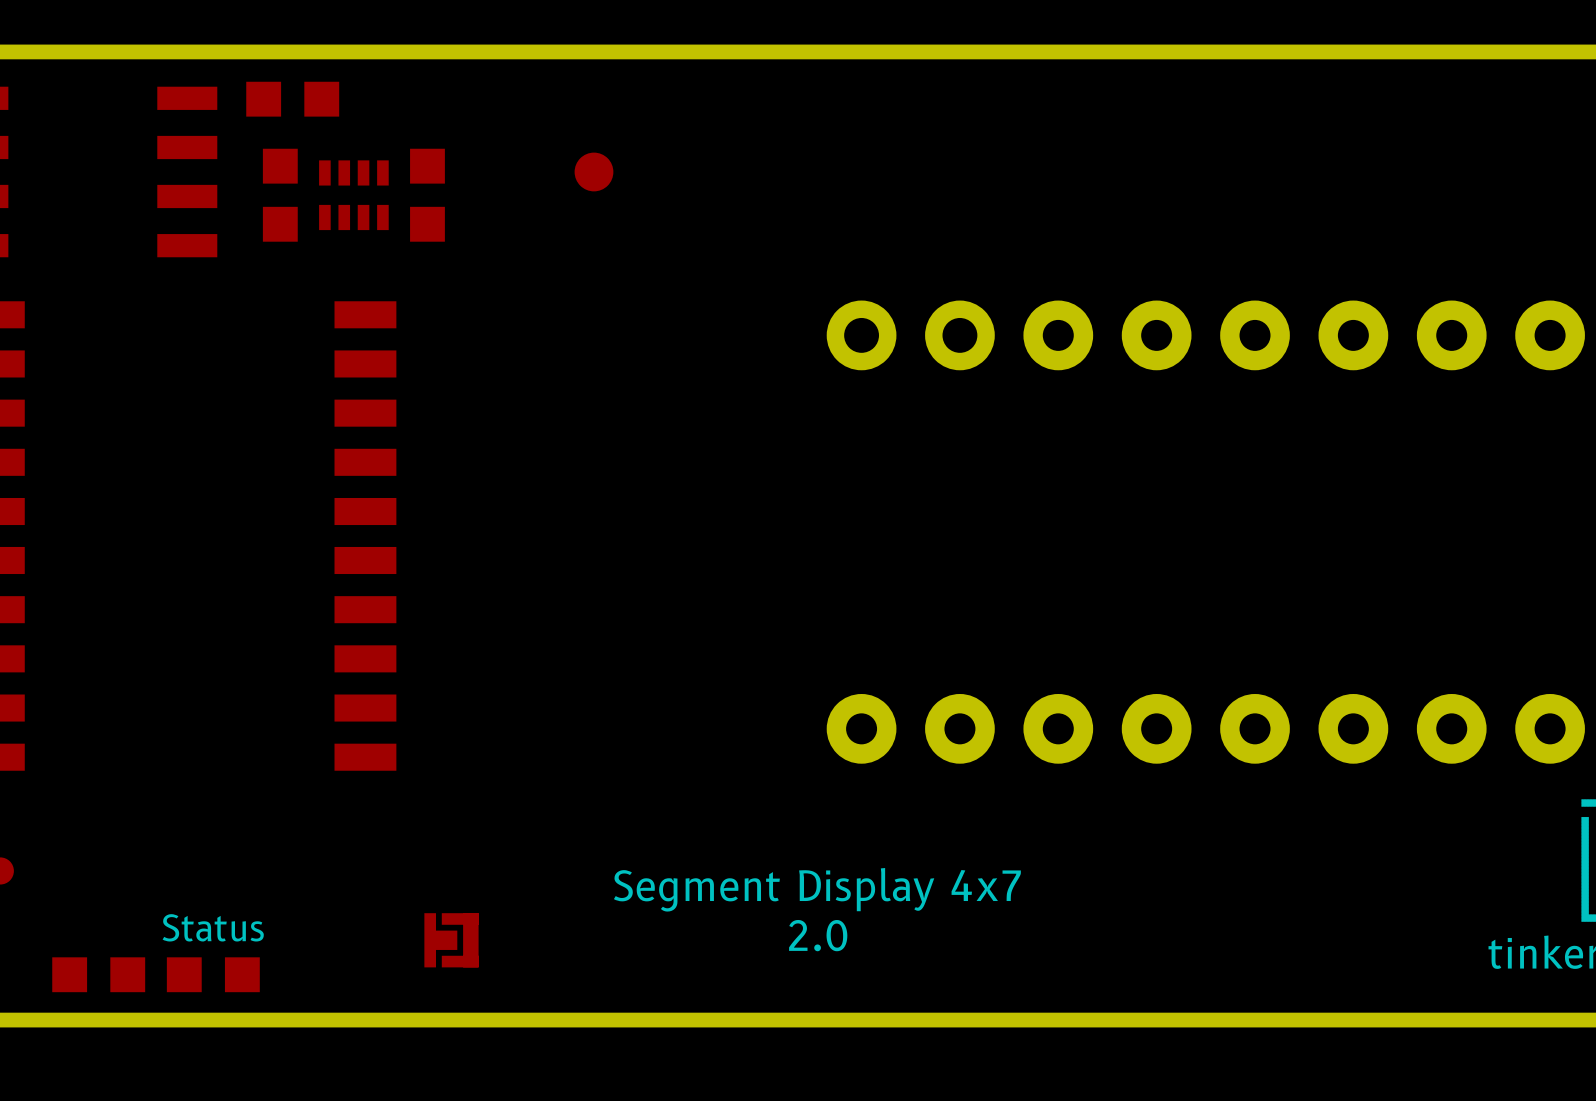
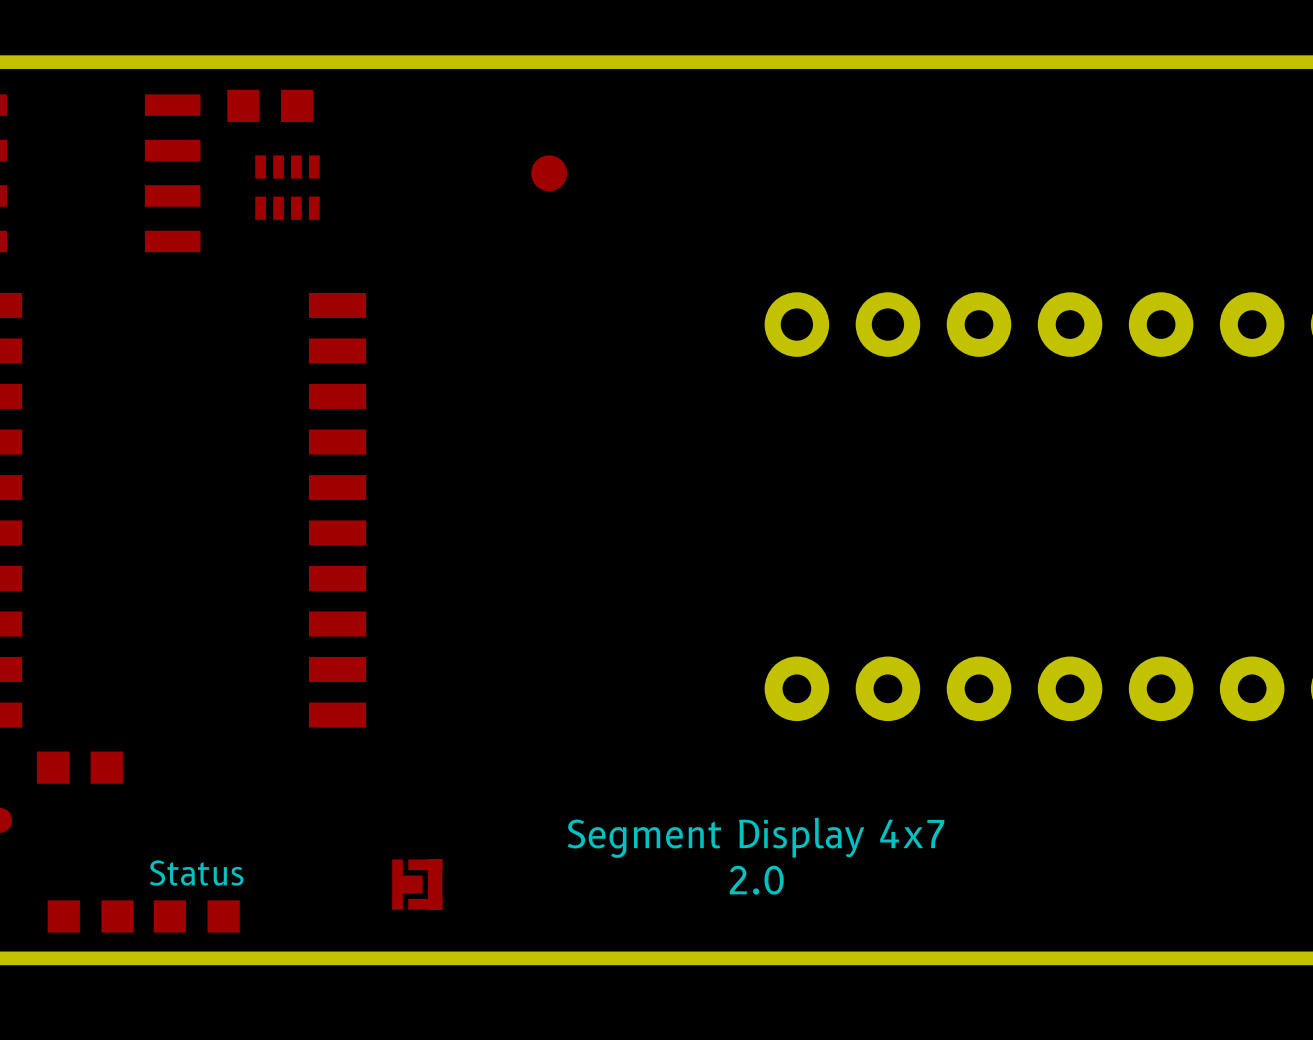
part: (280, 195) -> none
part position: (353, 195) -> (287, 187)
part: (427, 195) -> none
part: none -> (79, 767)

